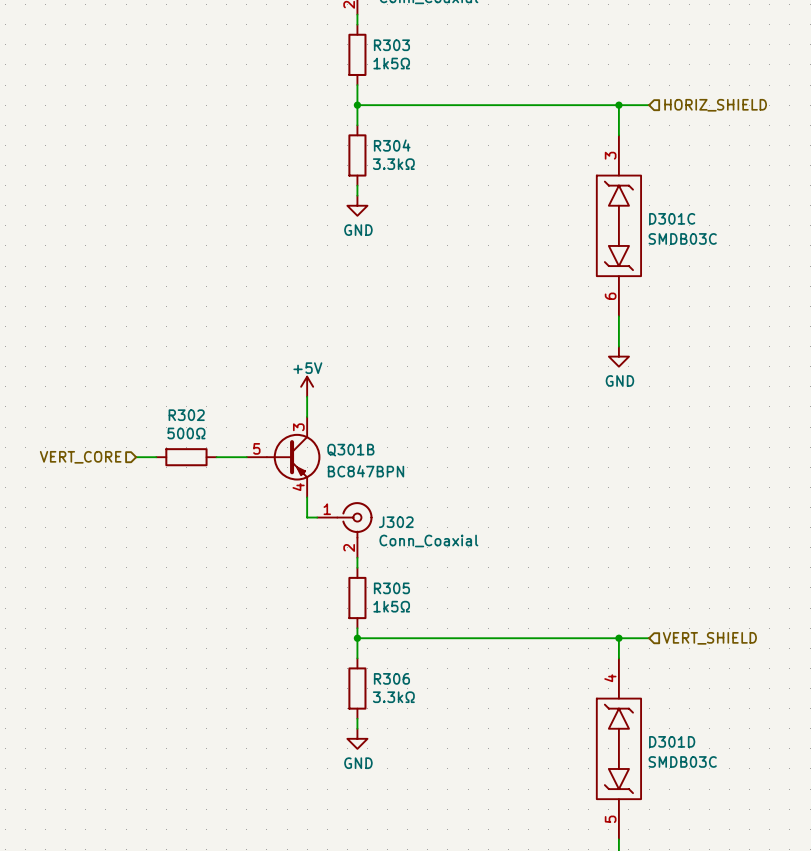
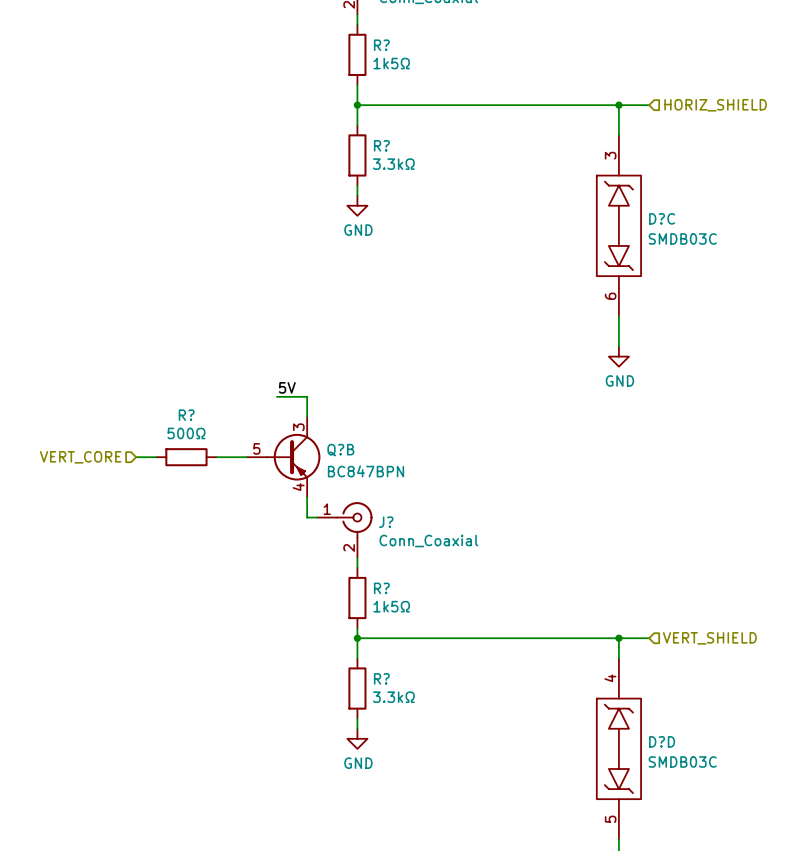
R303 name: R303 (391, 45) -> R? (381, 45)
R304 name: R304 (392, 145) -> R? (381, 145)
D301C name: D301C (672, 218) -> D?C (662, 218)
power symbol: +5V (307, 386) -> none
label: none -> 5V (287, 387)
wire: none -> (276, 396) (307, 396)
R302 name: R302 (186, 415) -> R? (186, 415)
Q301B name: Q301B (350, 450) -> Q?B (340, 450)
J302 name: J302 (396, 522) -> J? (386, 522)
R305 name: R305 (391, 588) -> R? (381, 588)
R306 name: R306 (391, 678) -> R? (381, 678)
D301D name: D301D (672, 741) -> D?D (662, 741)

